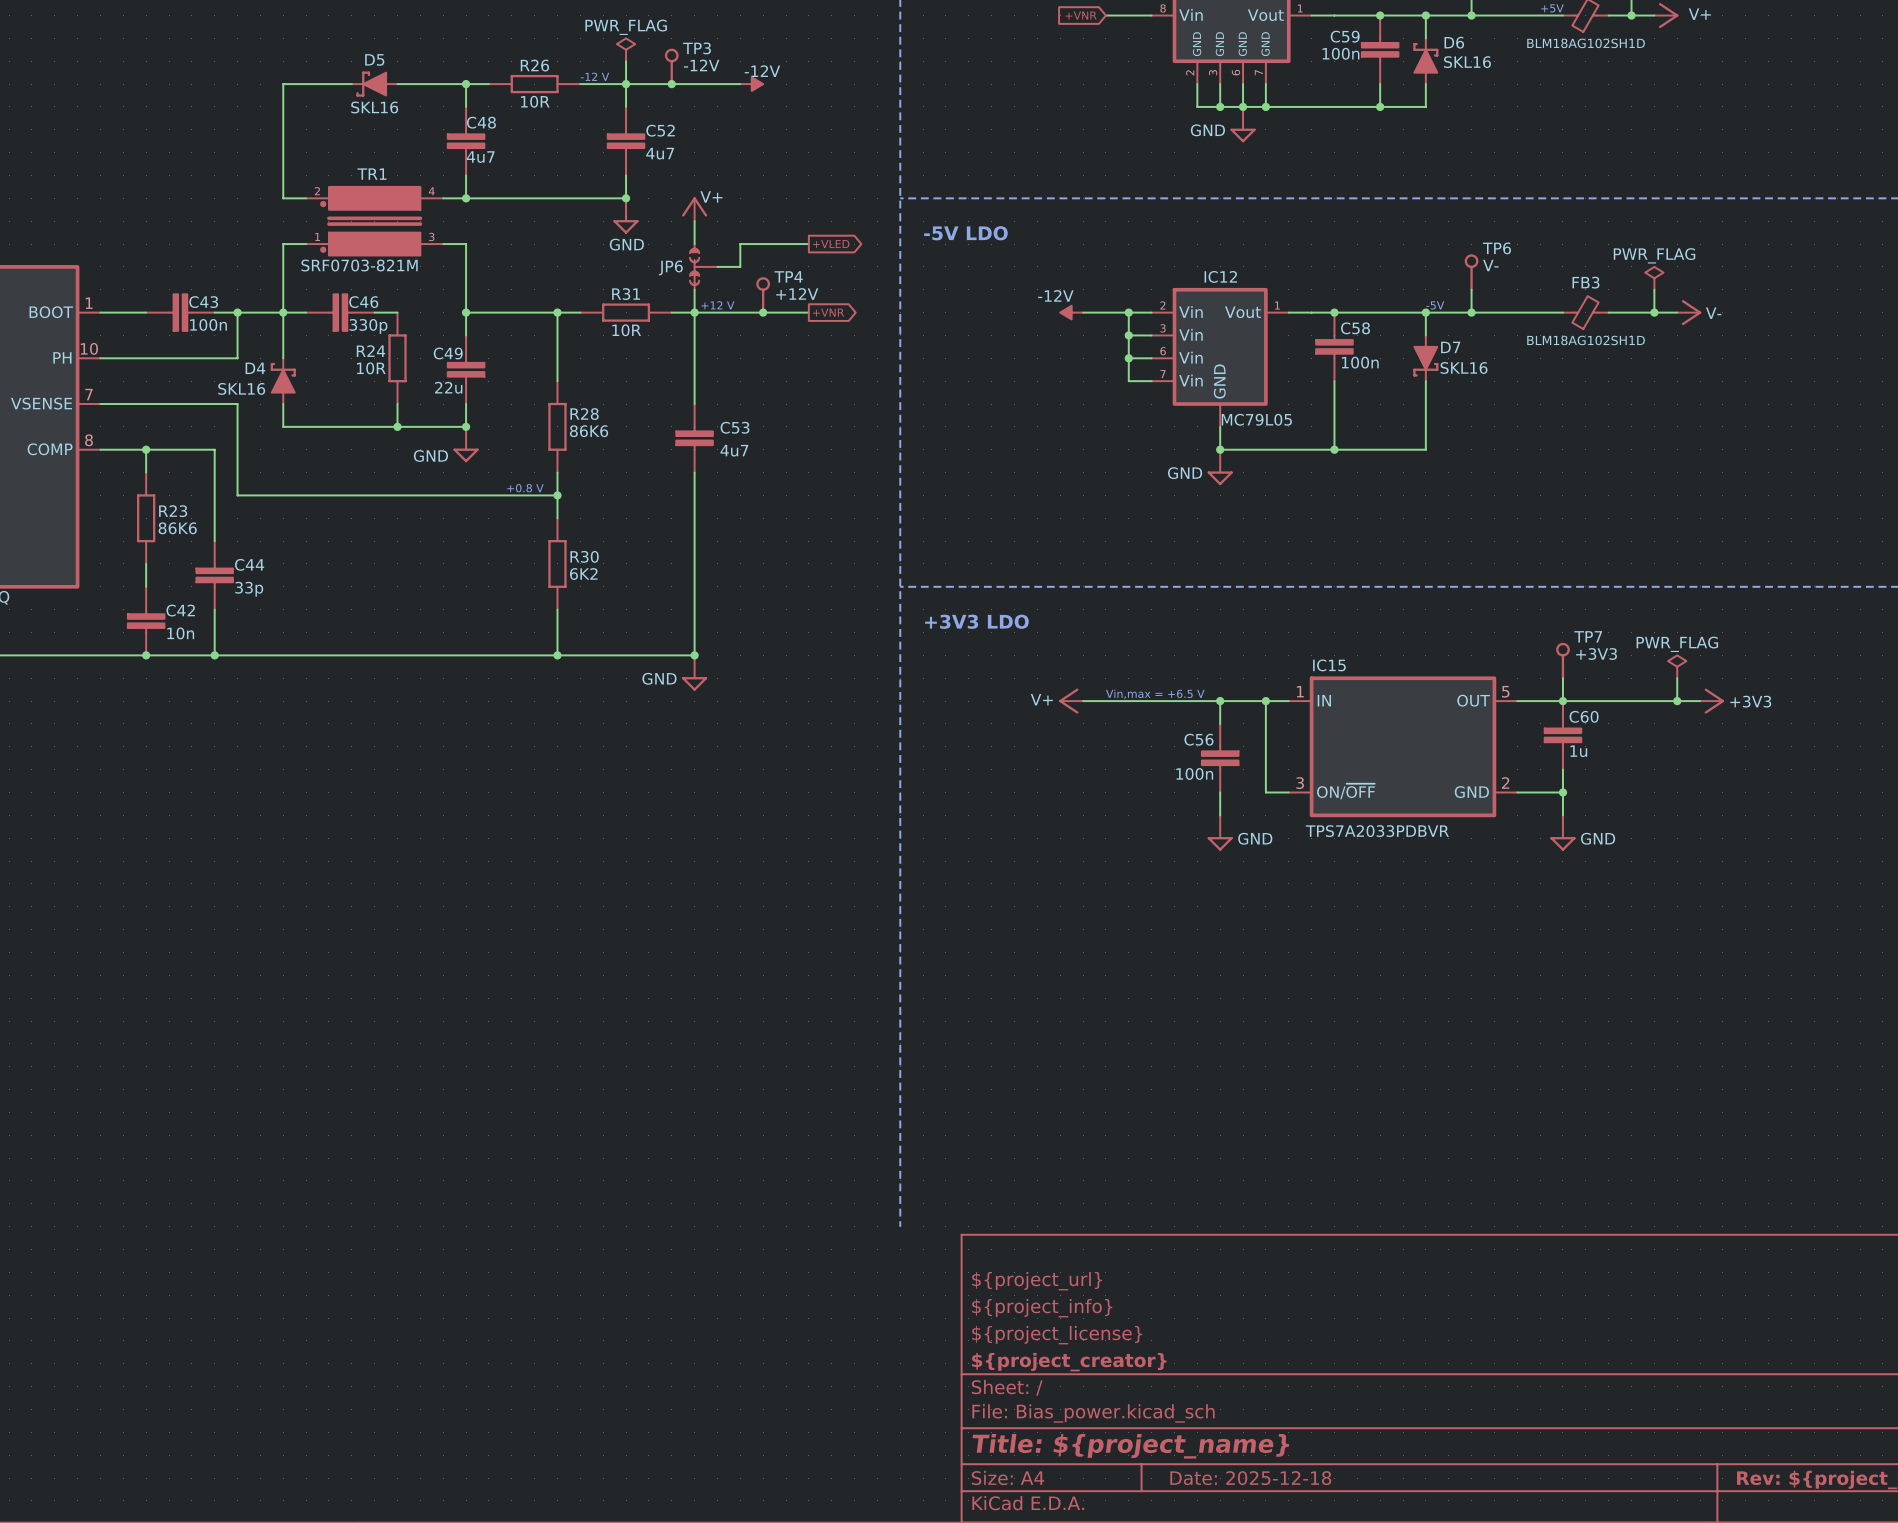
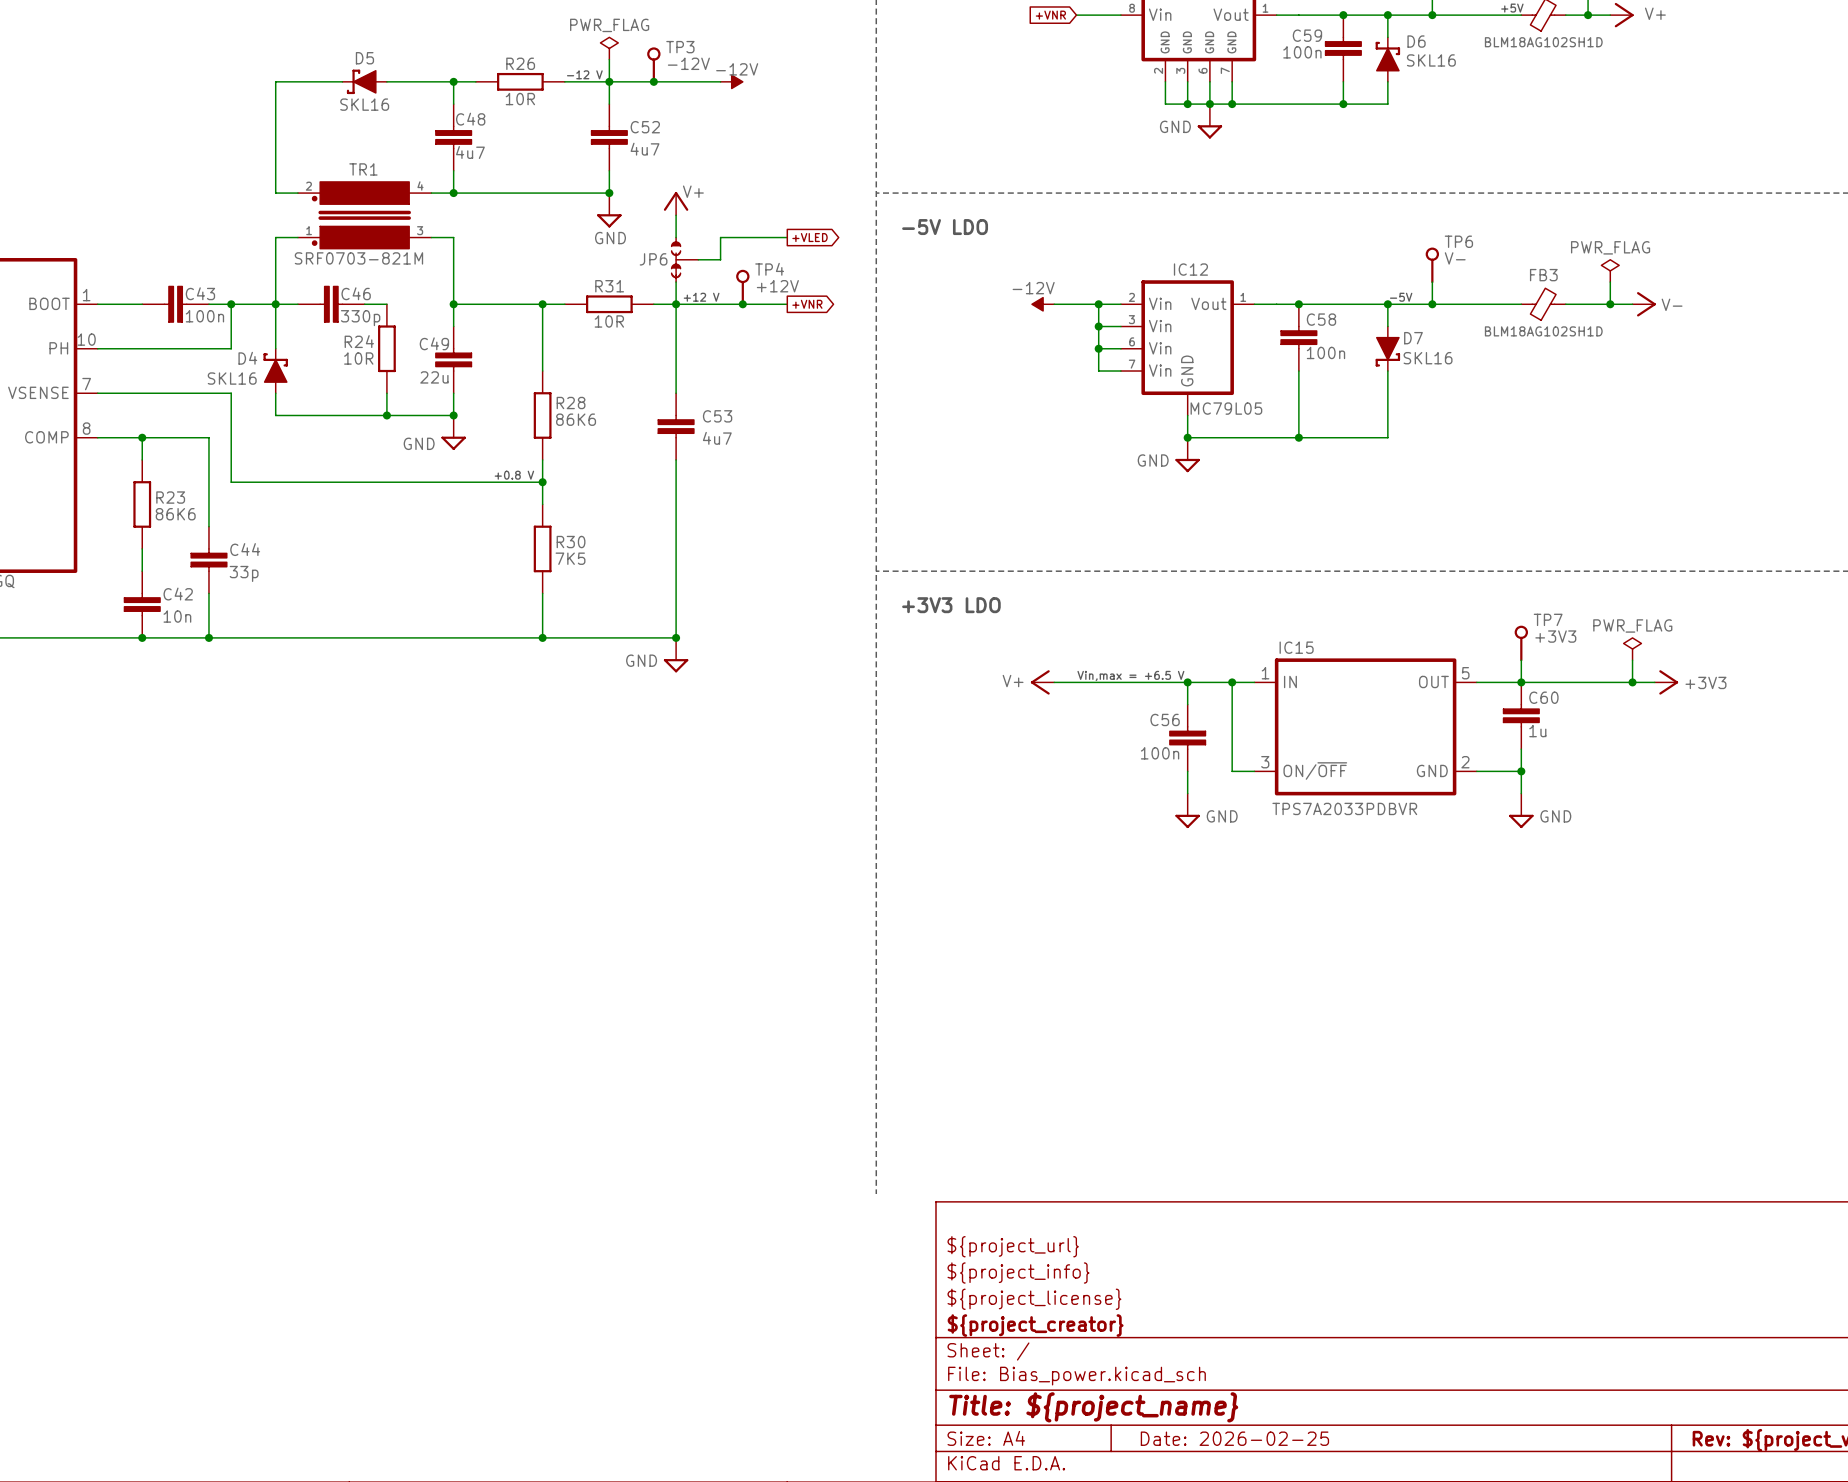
R30 value: 6K2 (583, 574) -> 7K5 (570, 558)
title block: Date: 2025-12-18 (1250, 1478) -> Date: 2026-02-25 (1234, 1438)

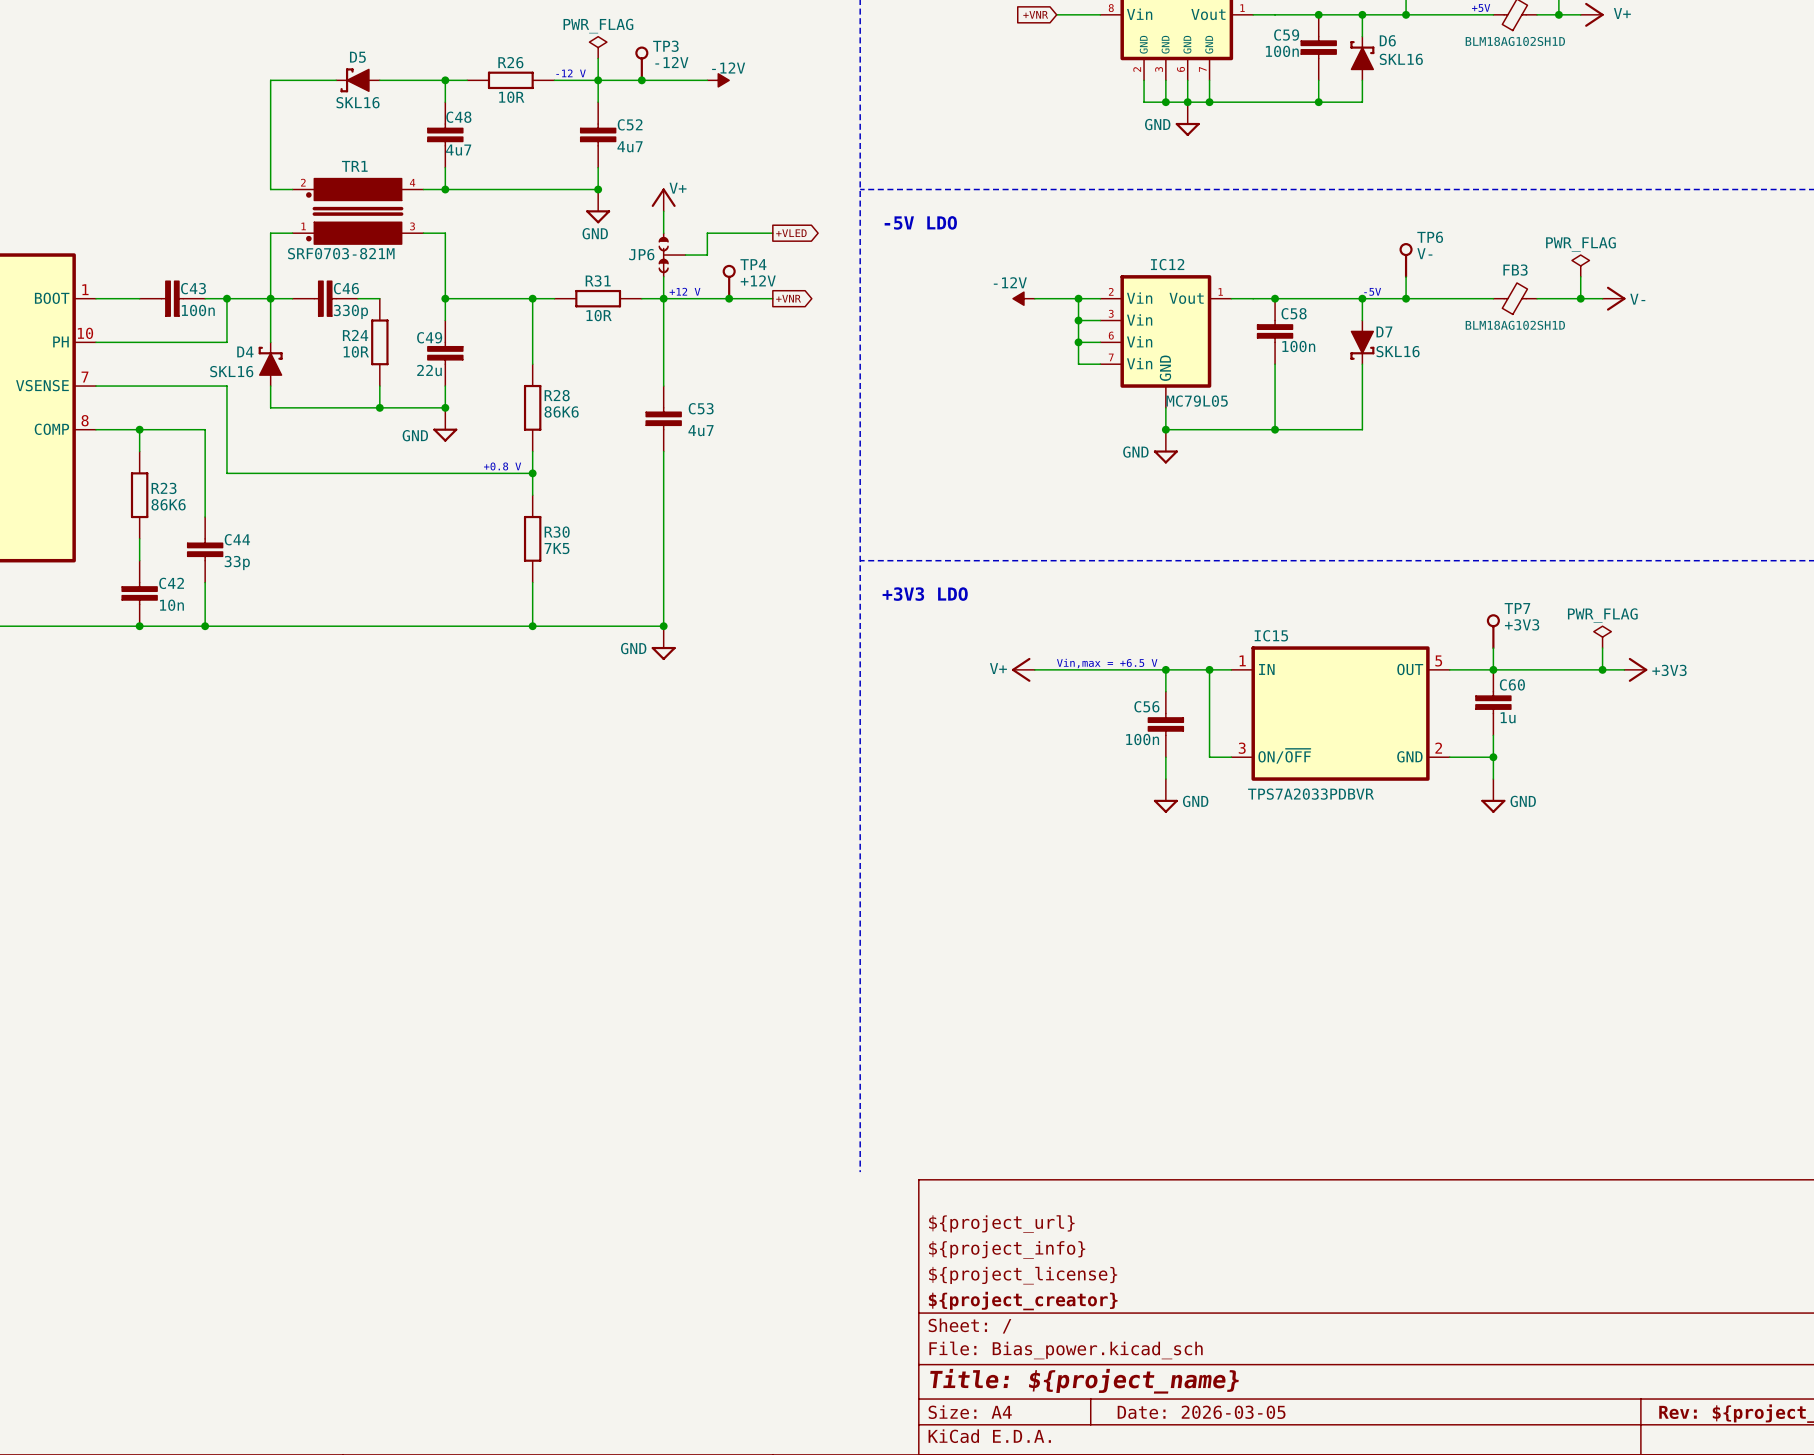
title block: Date: 2026-02-25 (1234, 1438) -> Date: 2026-03-05 (1201, 1412)

